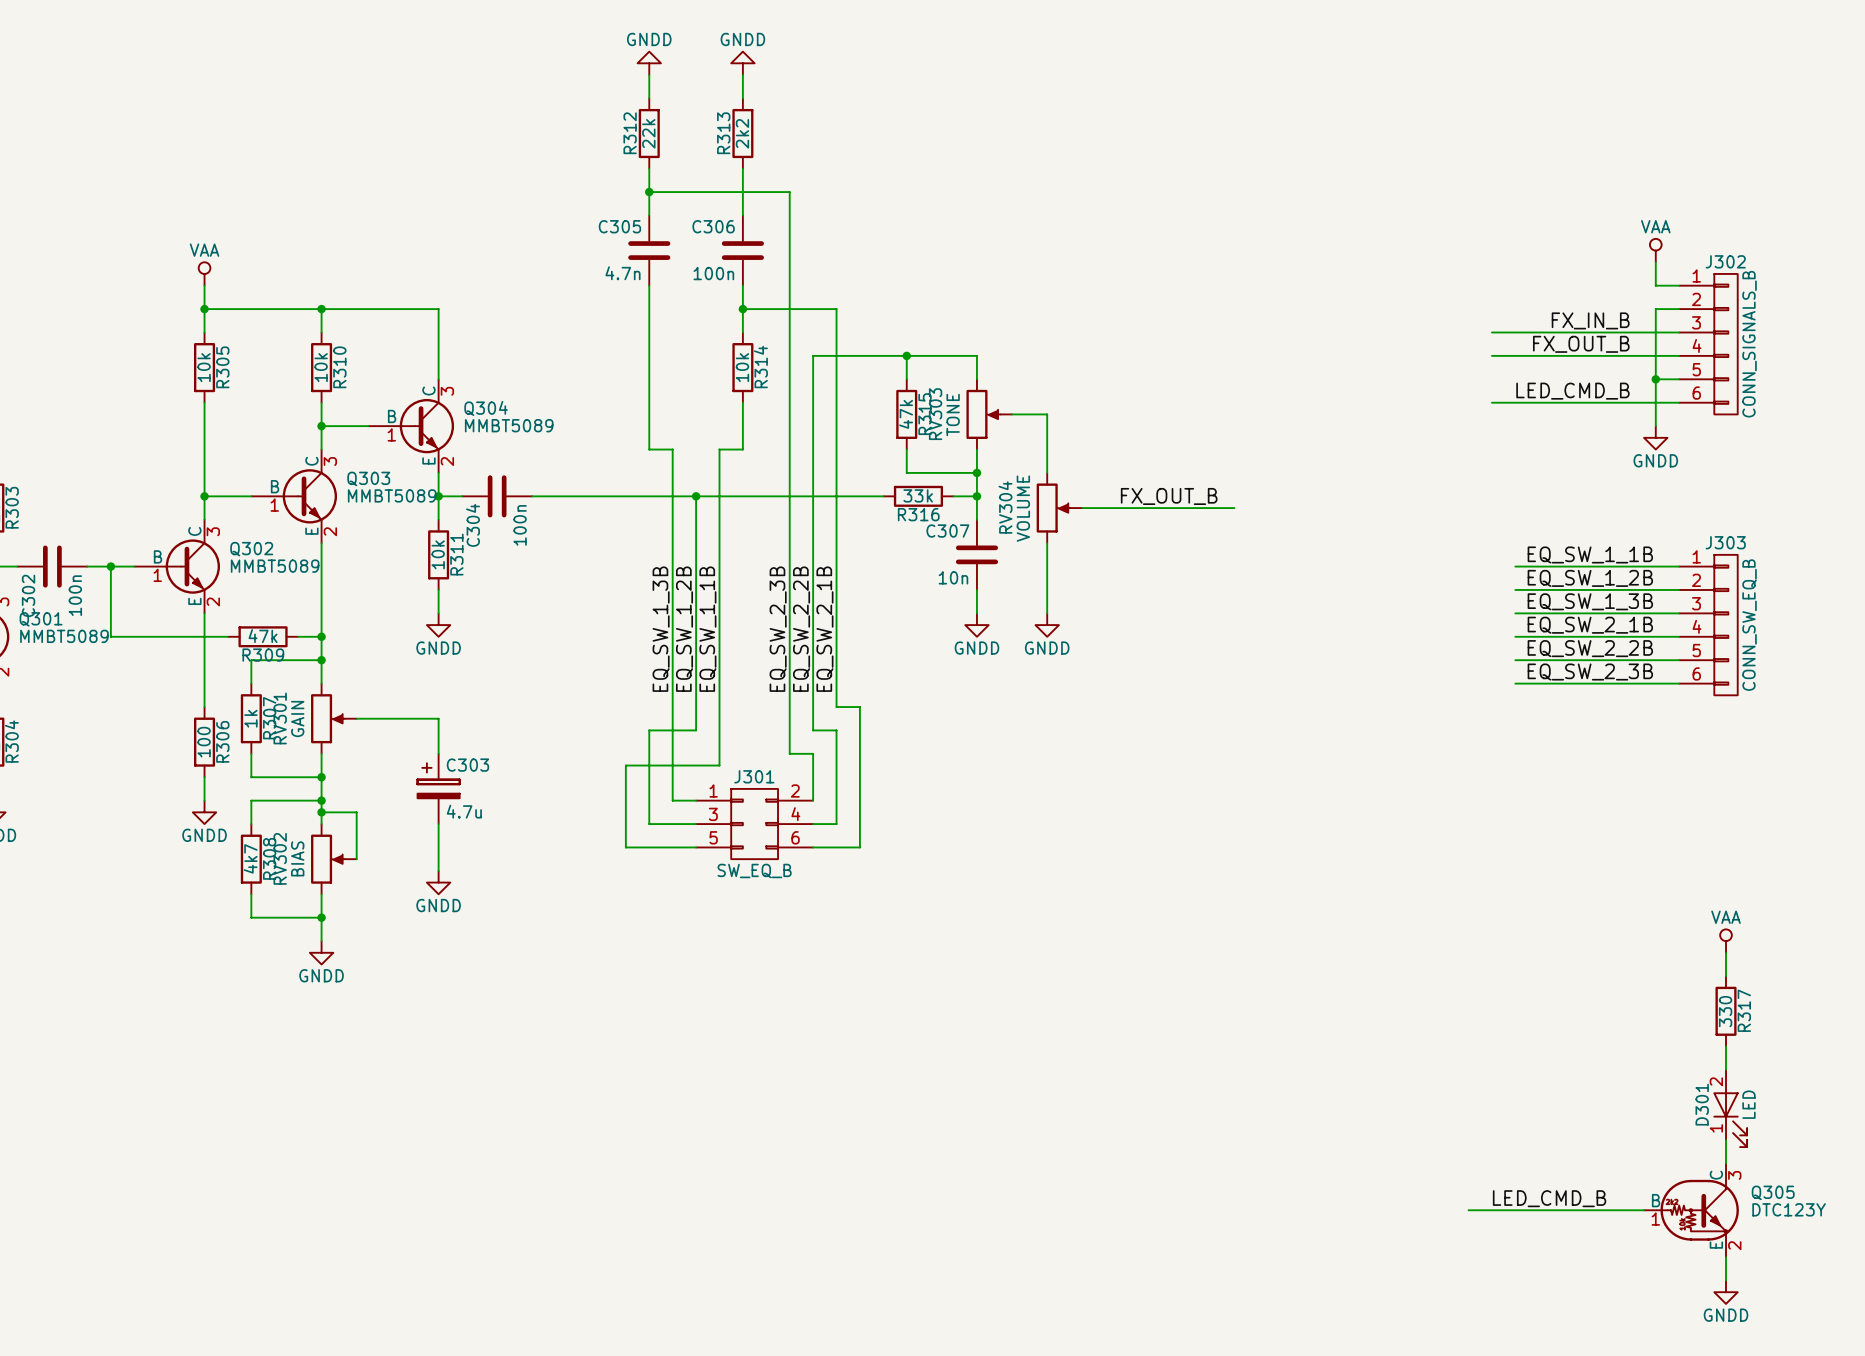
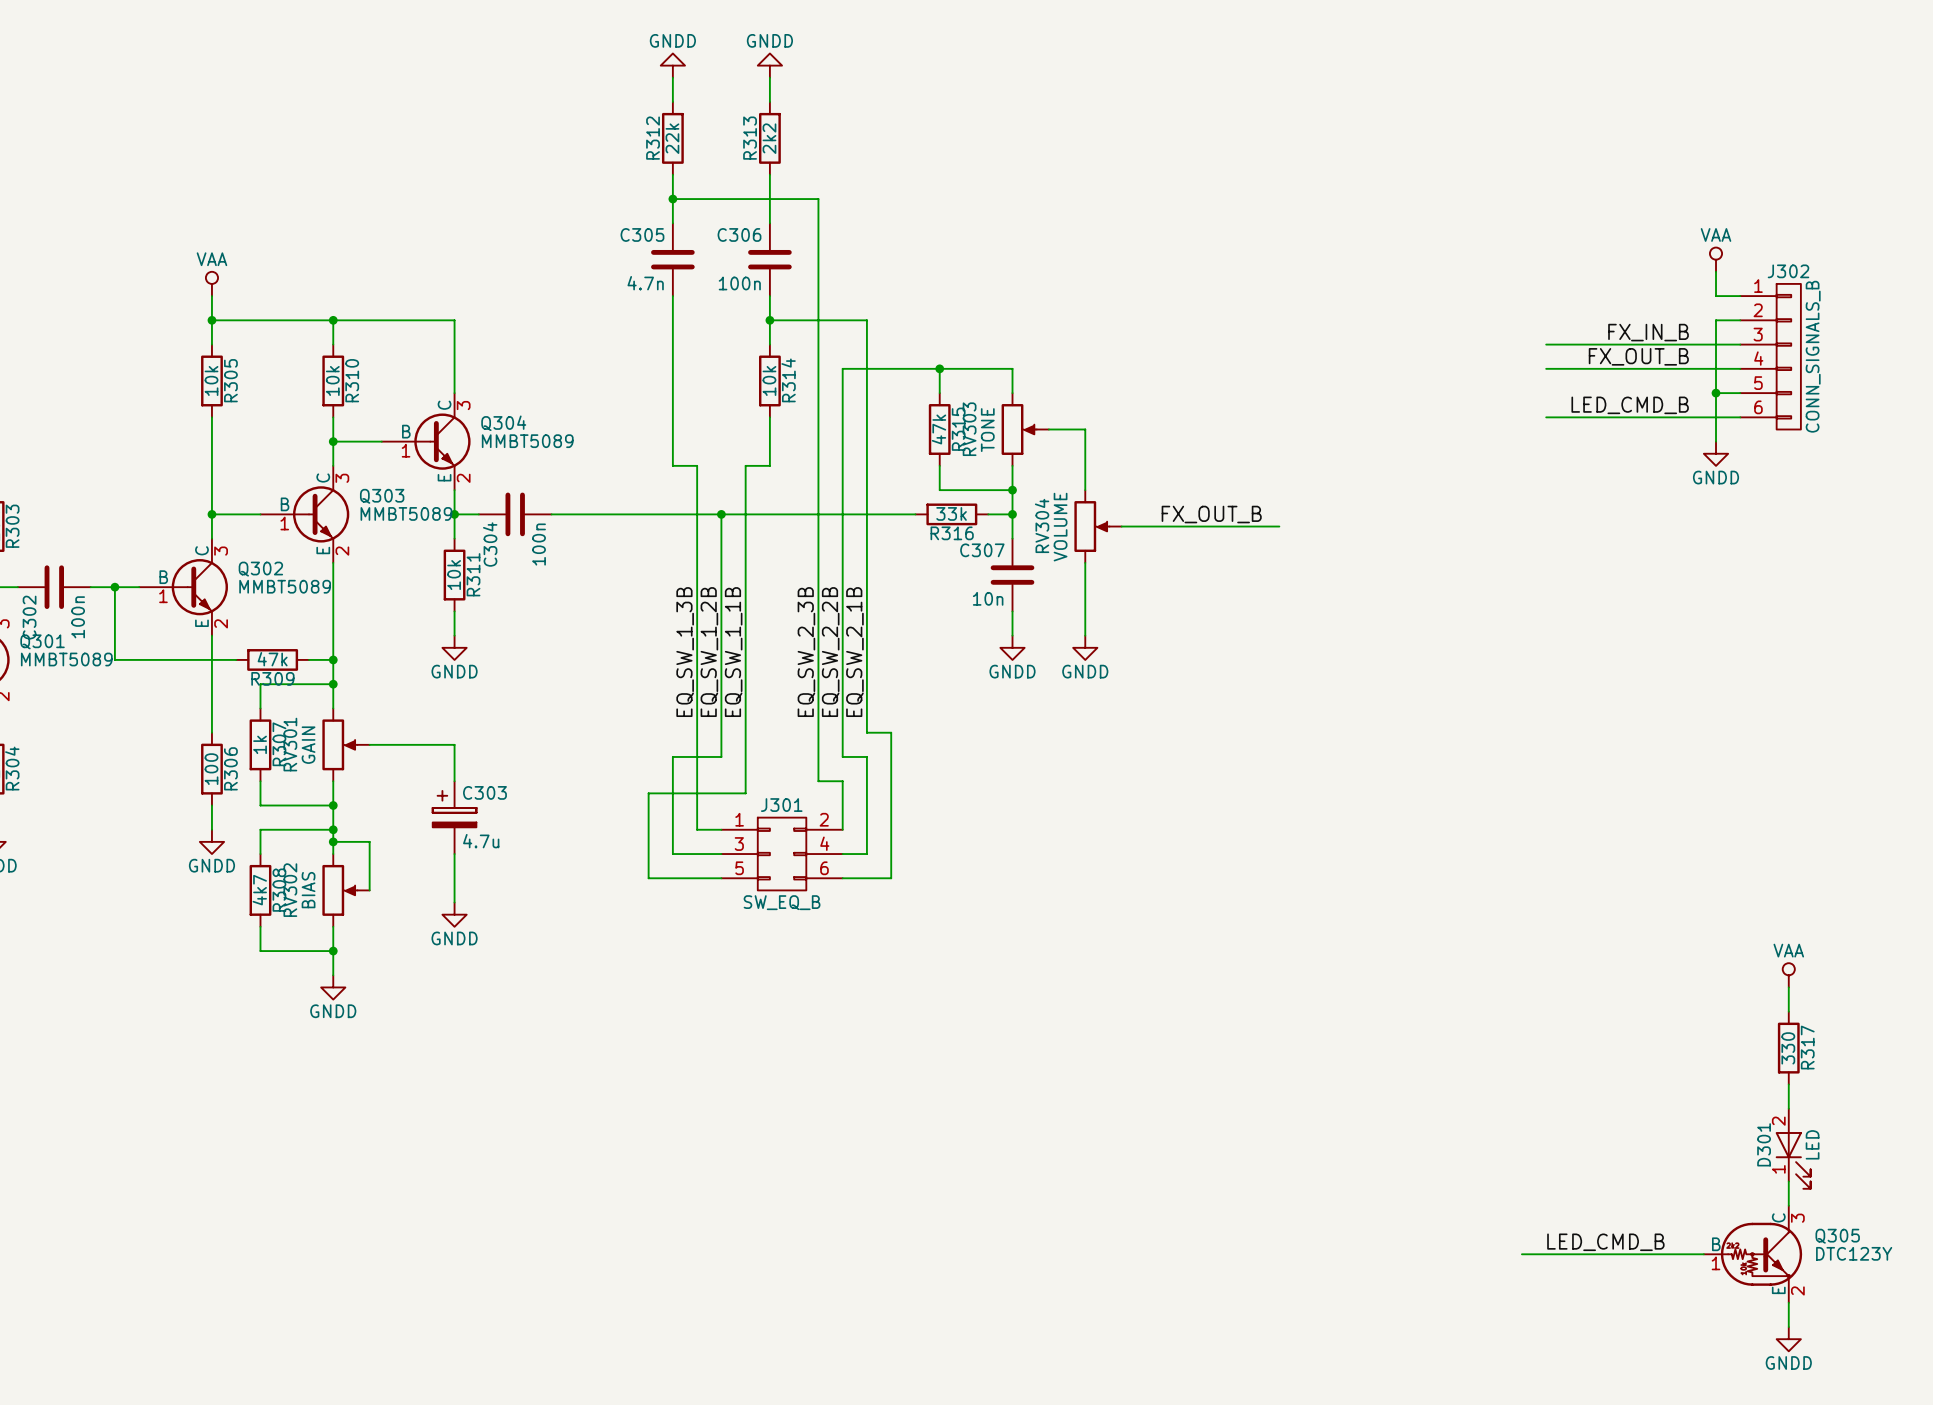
label: EQ_SW_1_1B (1590, 554) -> none
wire: (1515, 566) (1679, 566) -> none
label: EQ_SW_1_2B (1590, 578) -> none
wire: (1515, 589) (1679, 589) -> none
label: EQ_SW_1_3B (1590, 601) -> none
wire: (1515, 613) (1679, 613) -> none
label: EQ_SW_2_1B (1590, 625) -> none
J303: CONN_SW_EQ_B (1708, 625) -> none
wire: (1515, 636) (1679, 636) -> none
label: EQ_SW_2_2B (1590, 648) -> none
wire: (1515, 660) (1679, 660) -> none
label: EQ_SW_2_3B (1590, 672) -> none
wire: (1515, 683) (1679, 683) -> none

